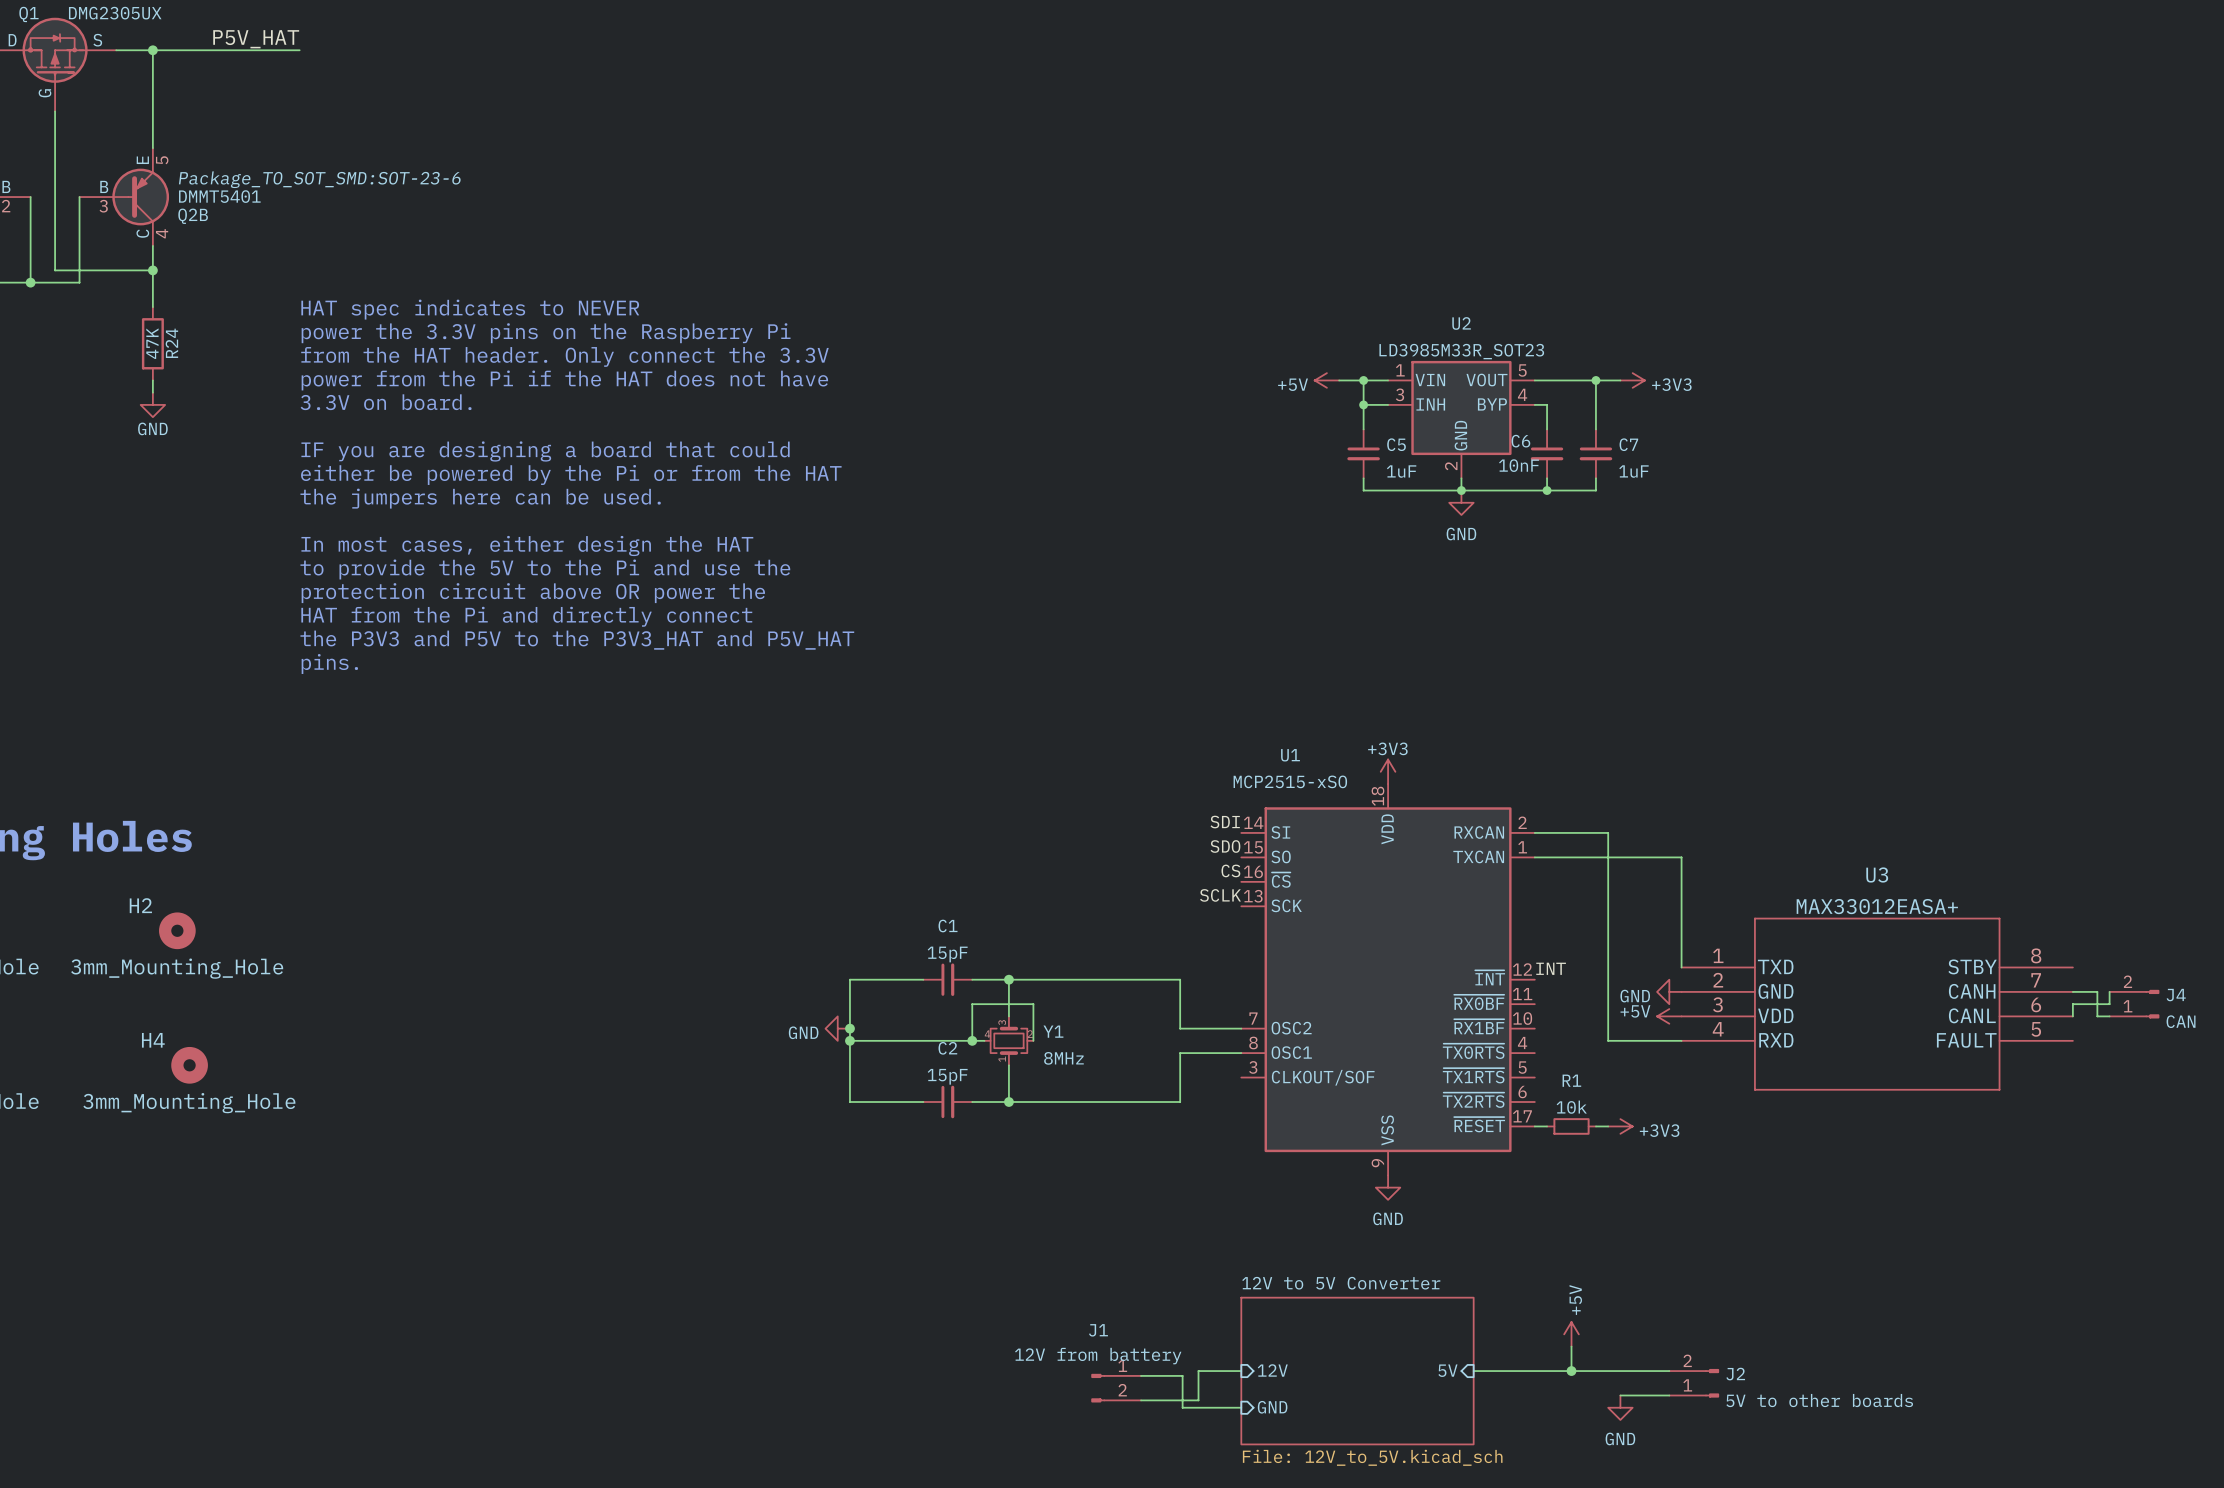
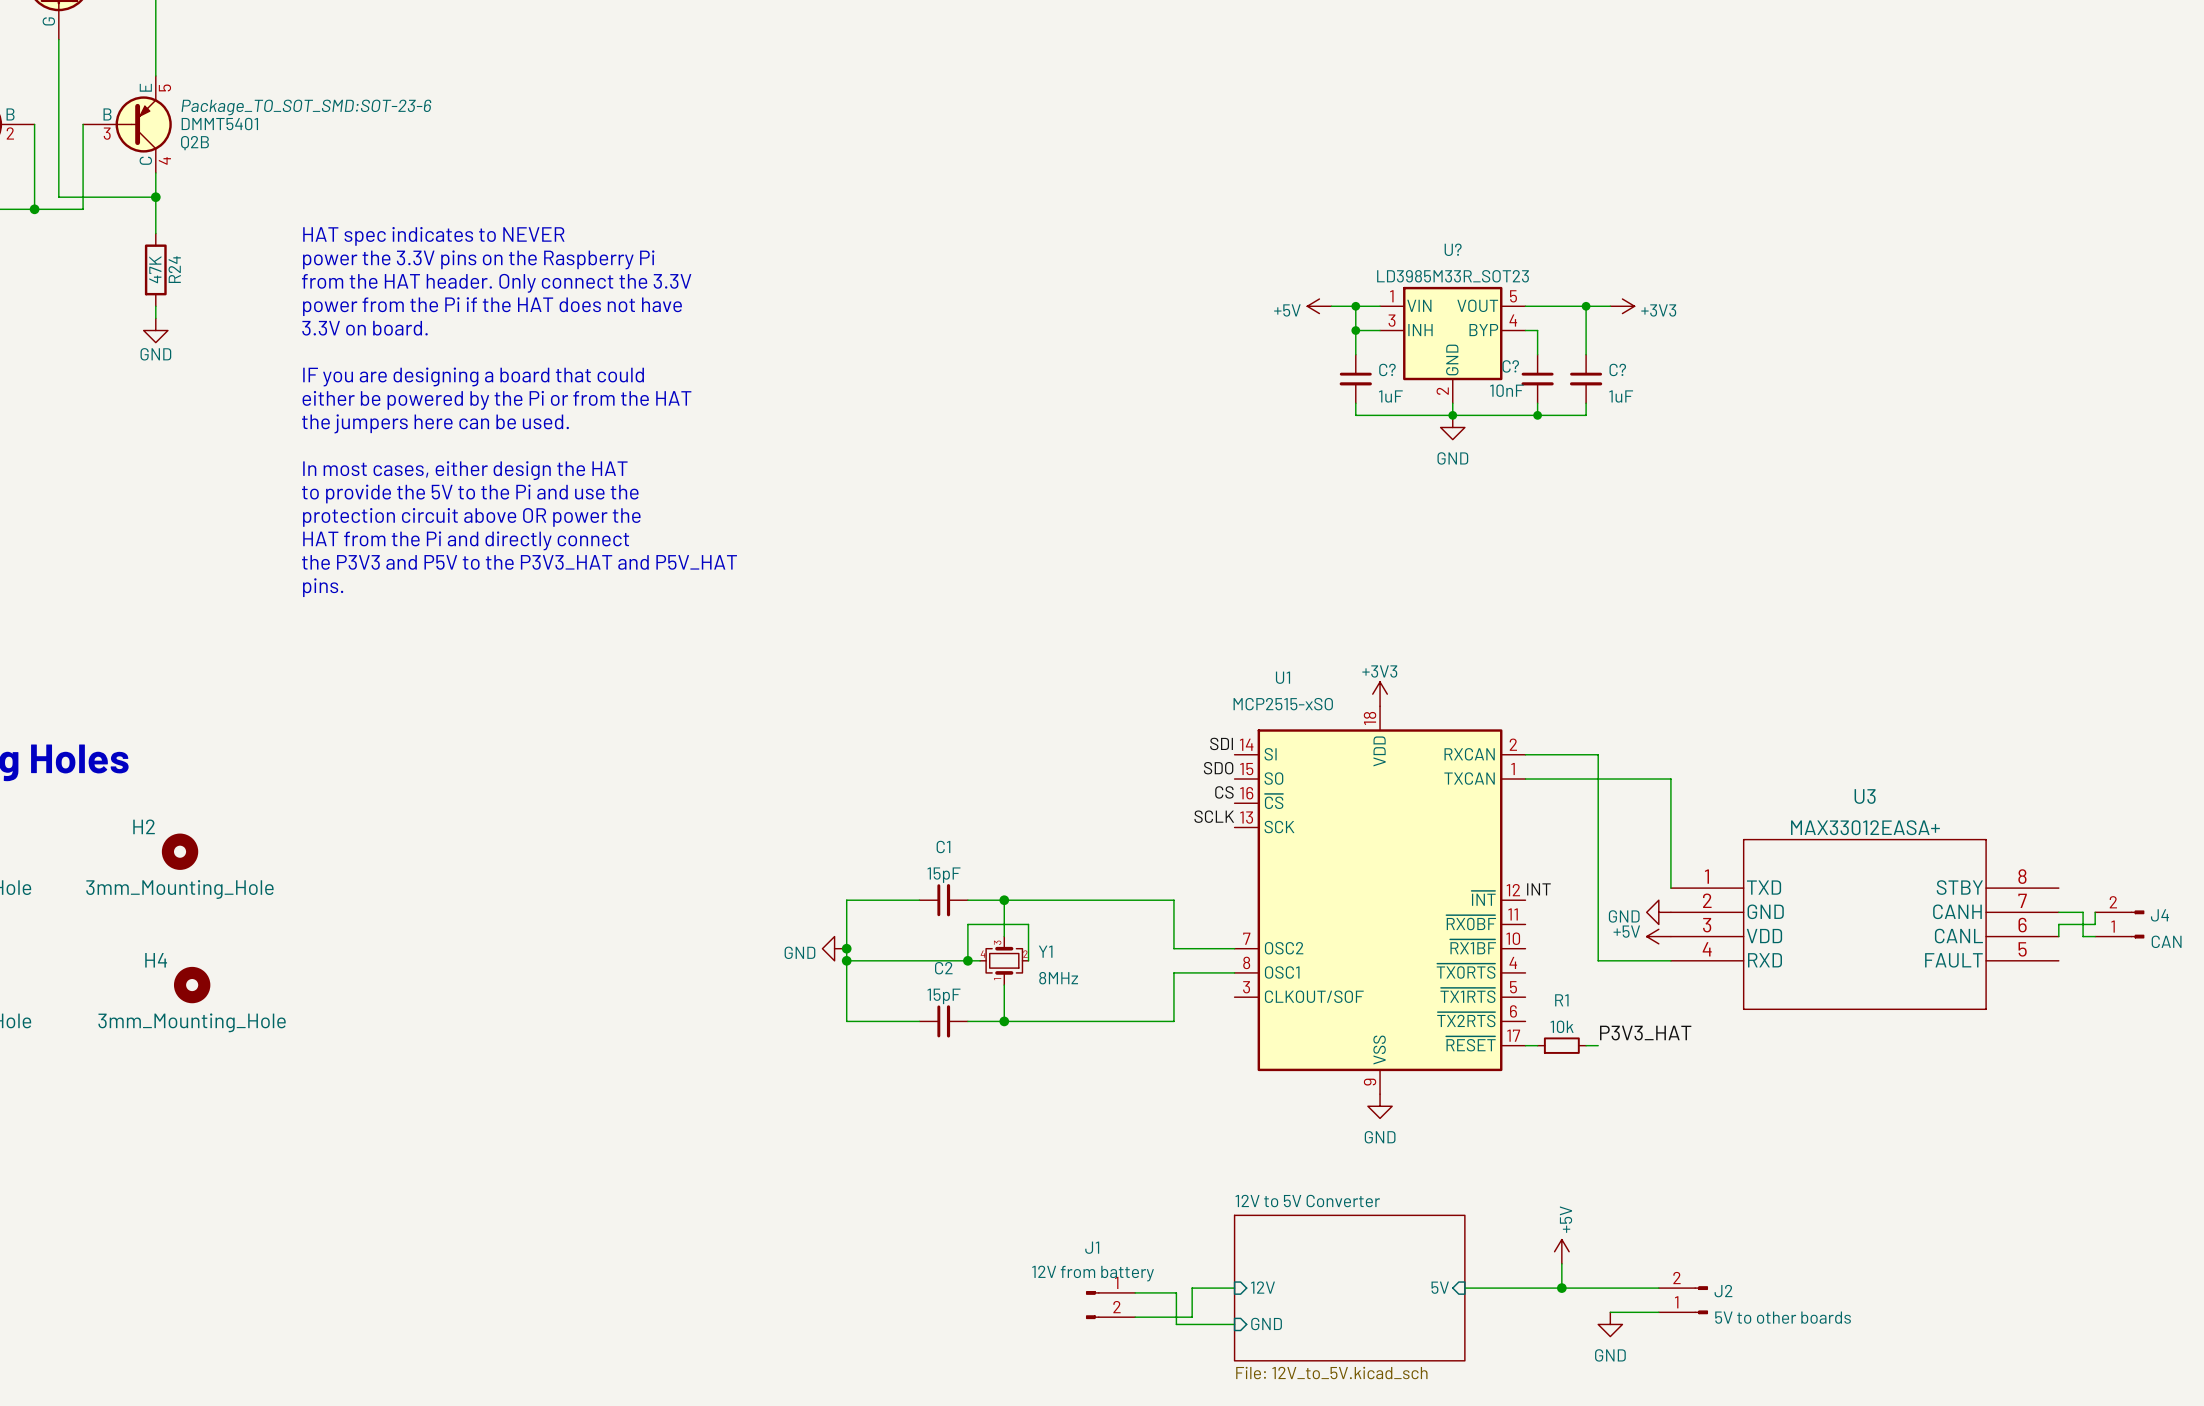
U2 name: U2 (1461, 323) -> U? (1453, 249)
C6 name: C6 (1520, 441) -> C? (1510, 366)
C5 name: C5 (1396, 444) -> C? (1387, 369)
C7 name: C7 (1628, 444) -> C? (1617, 369)
label: none -> P3V3_HAT (1645, 1033)
power symbol: +3V3 (1620, 1126) -> none

